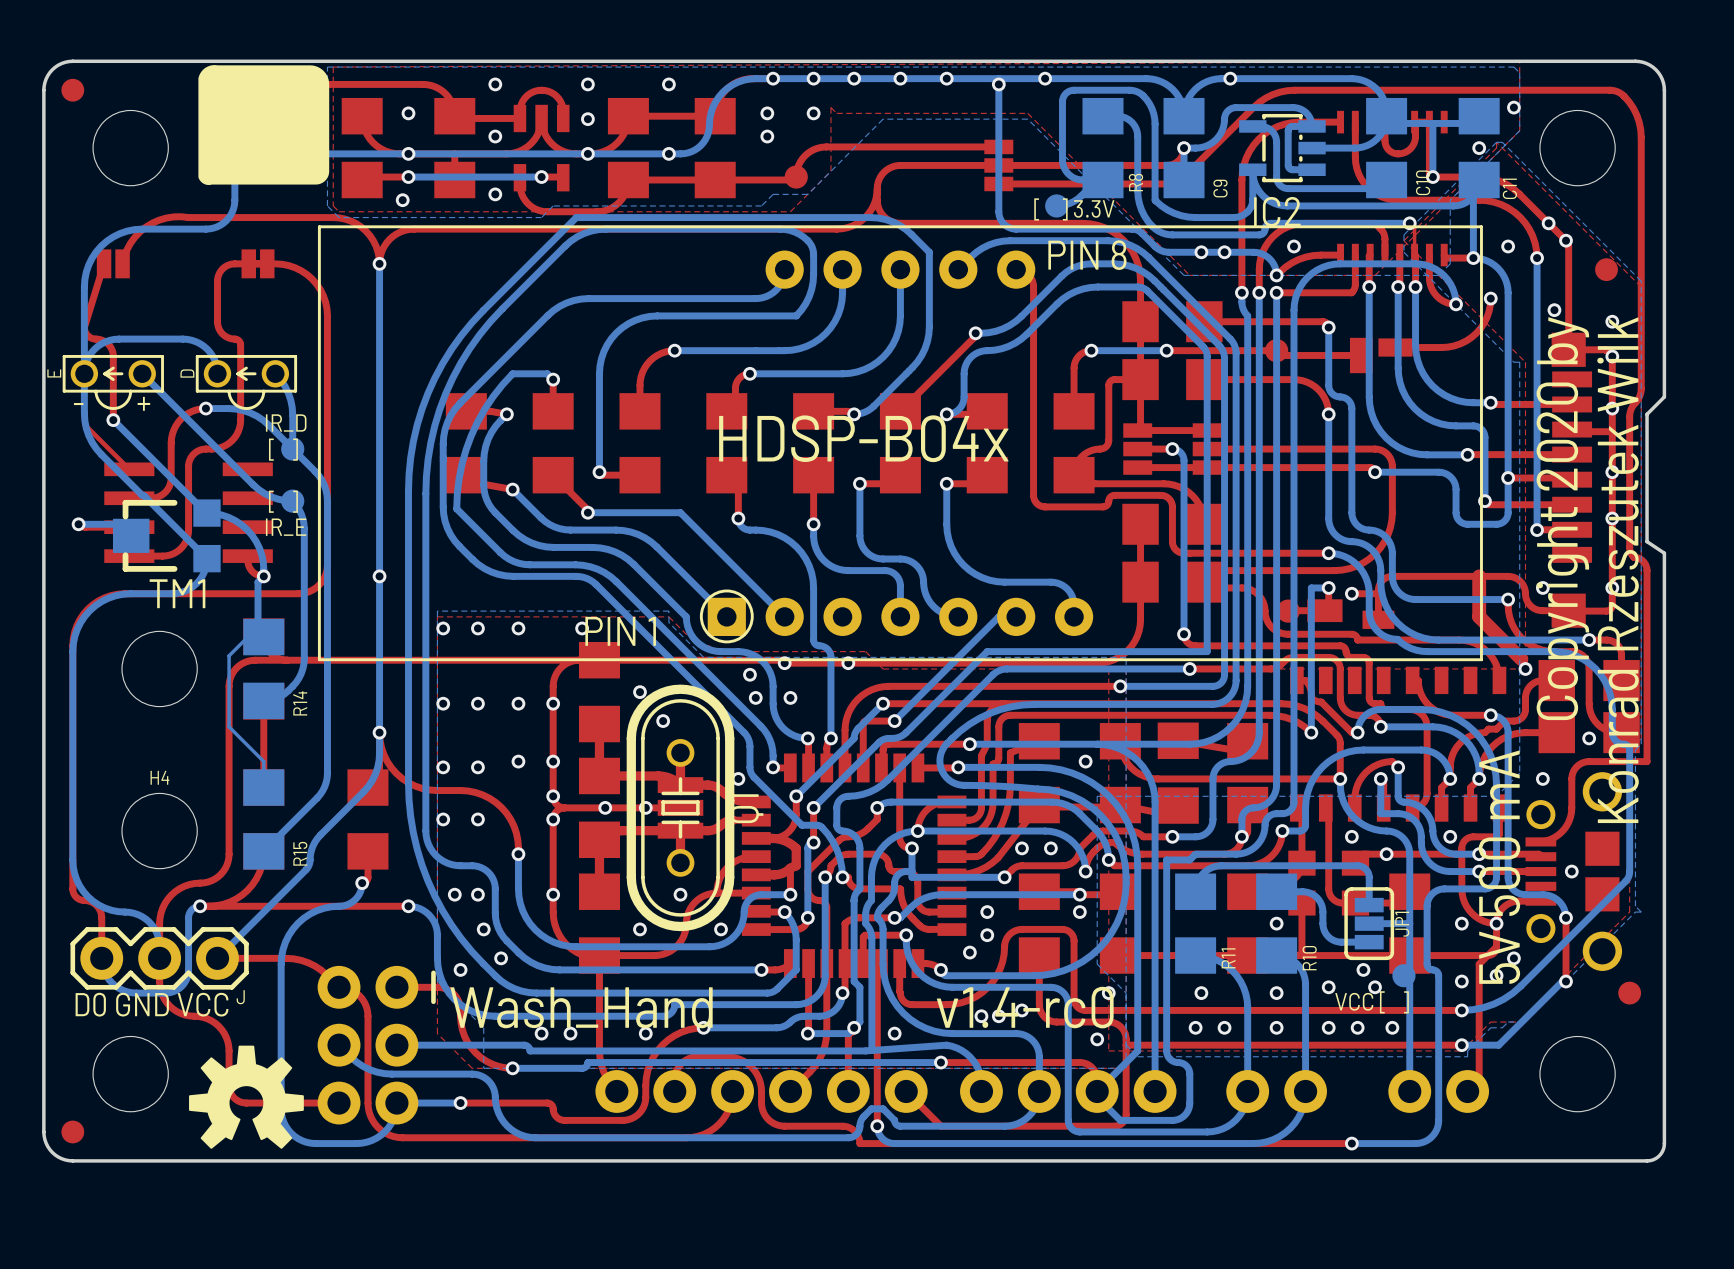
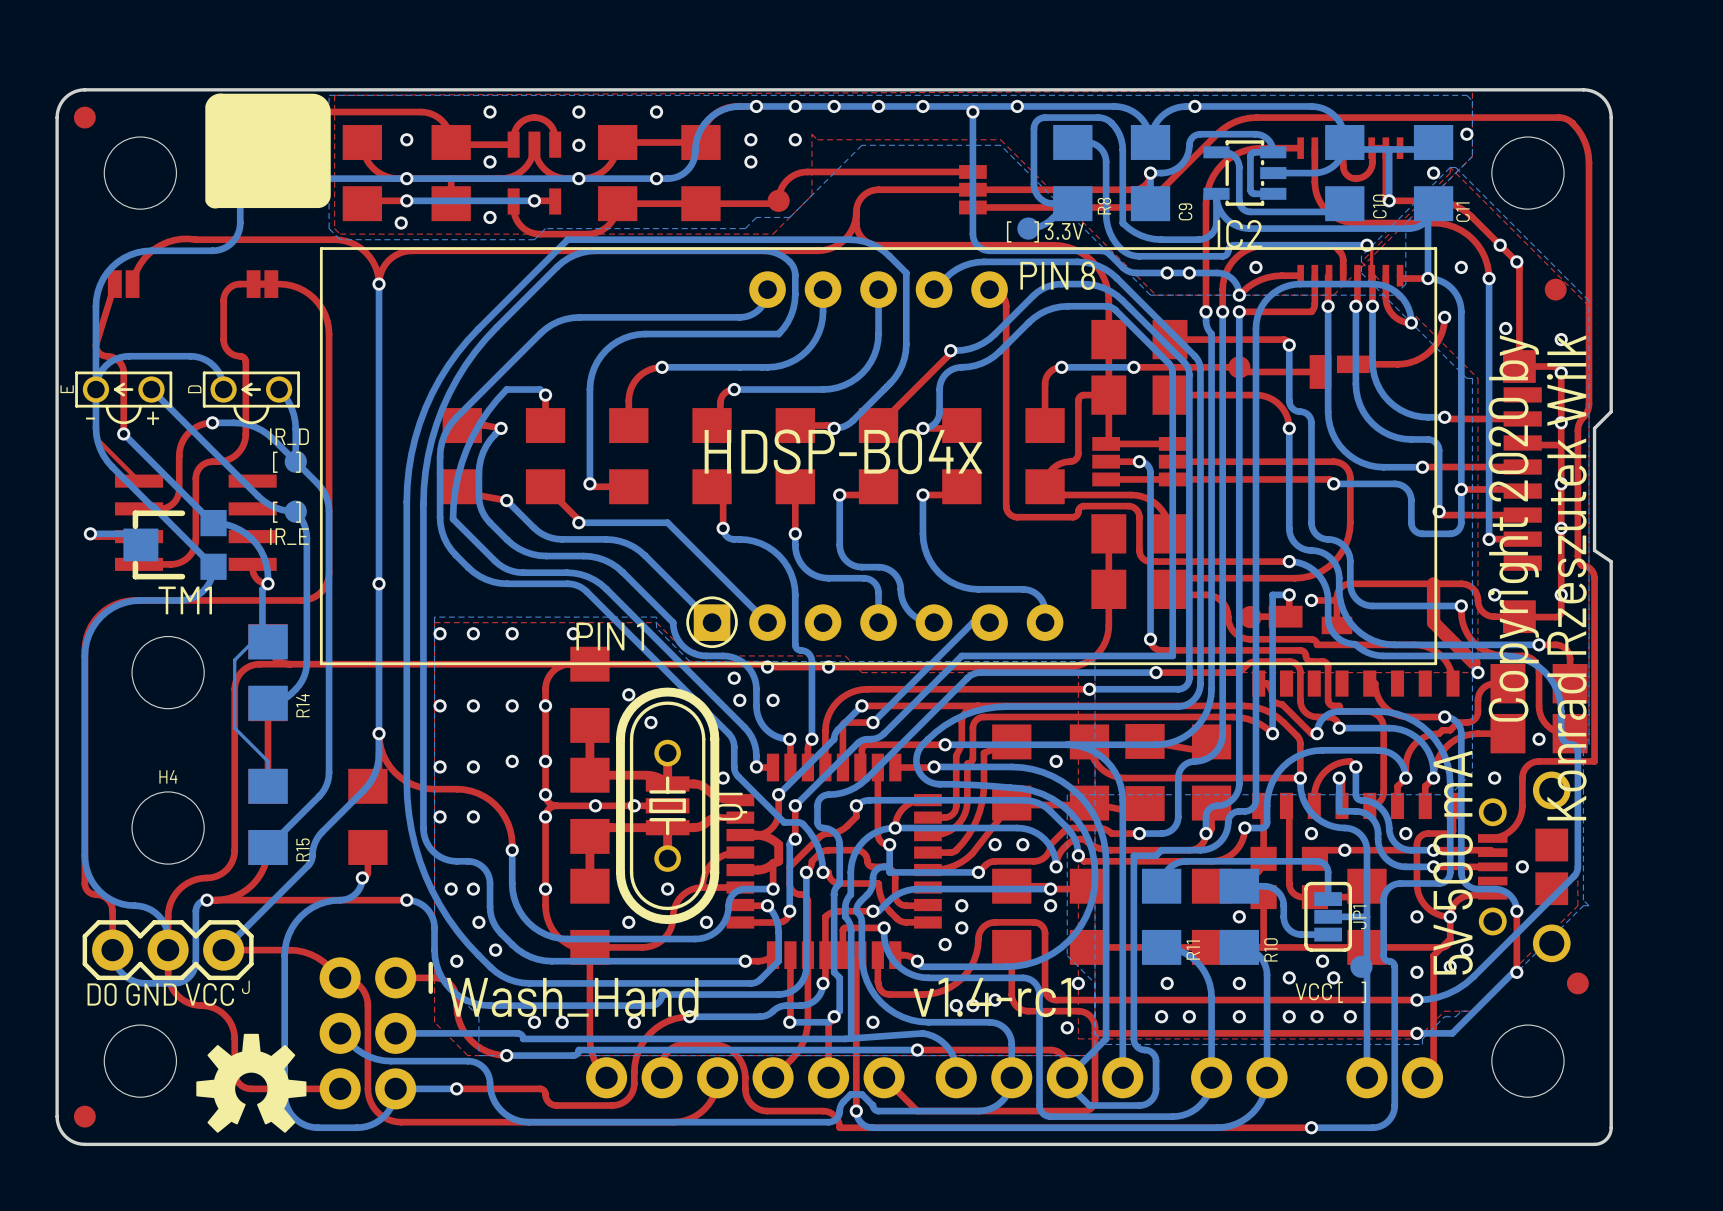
text: v1.4-rc0 (1025, 1007) -> v1.4-rc1 (992, 997)

